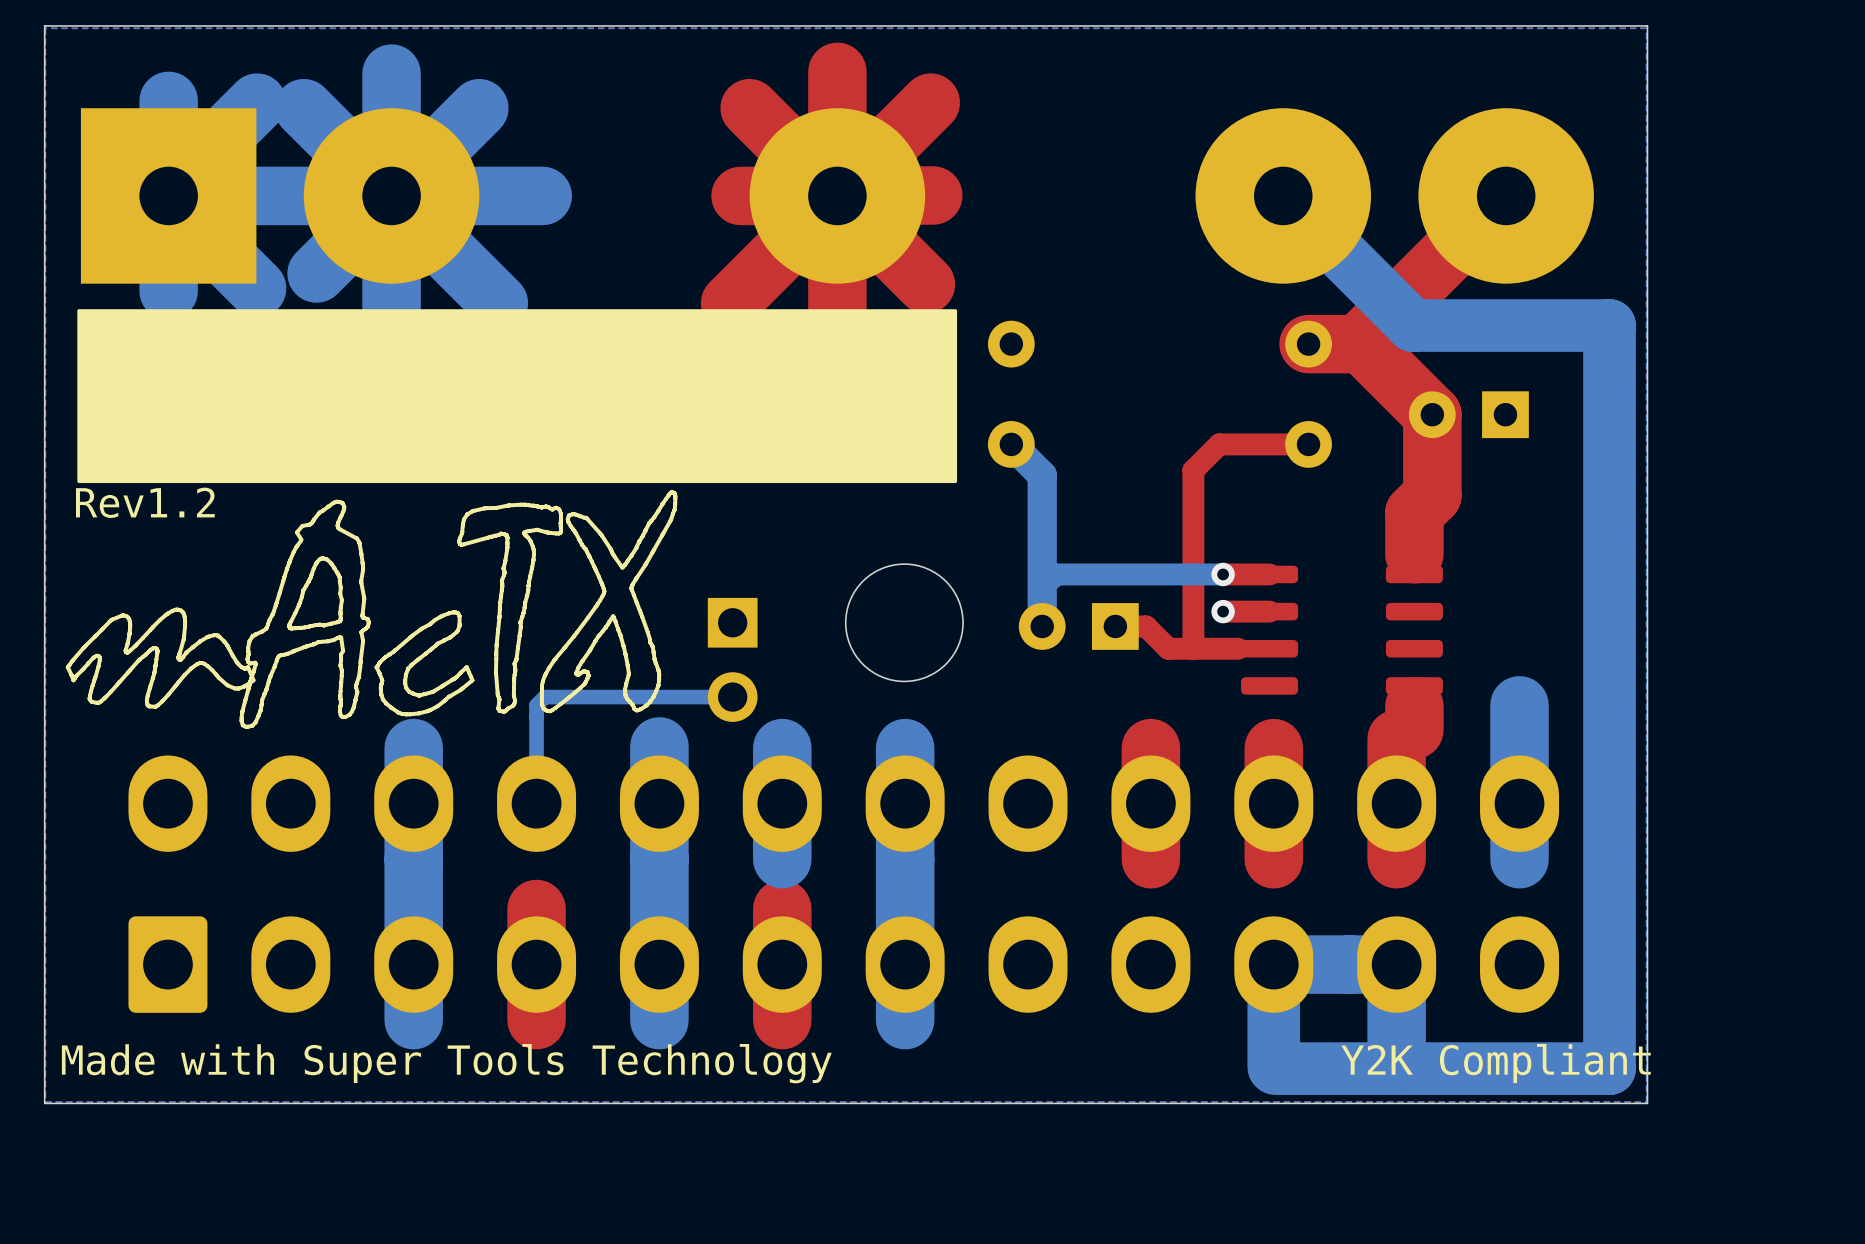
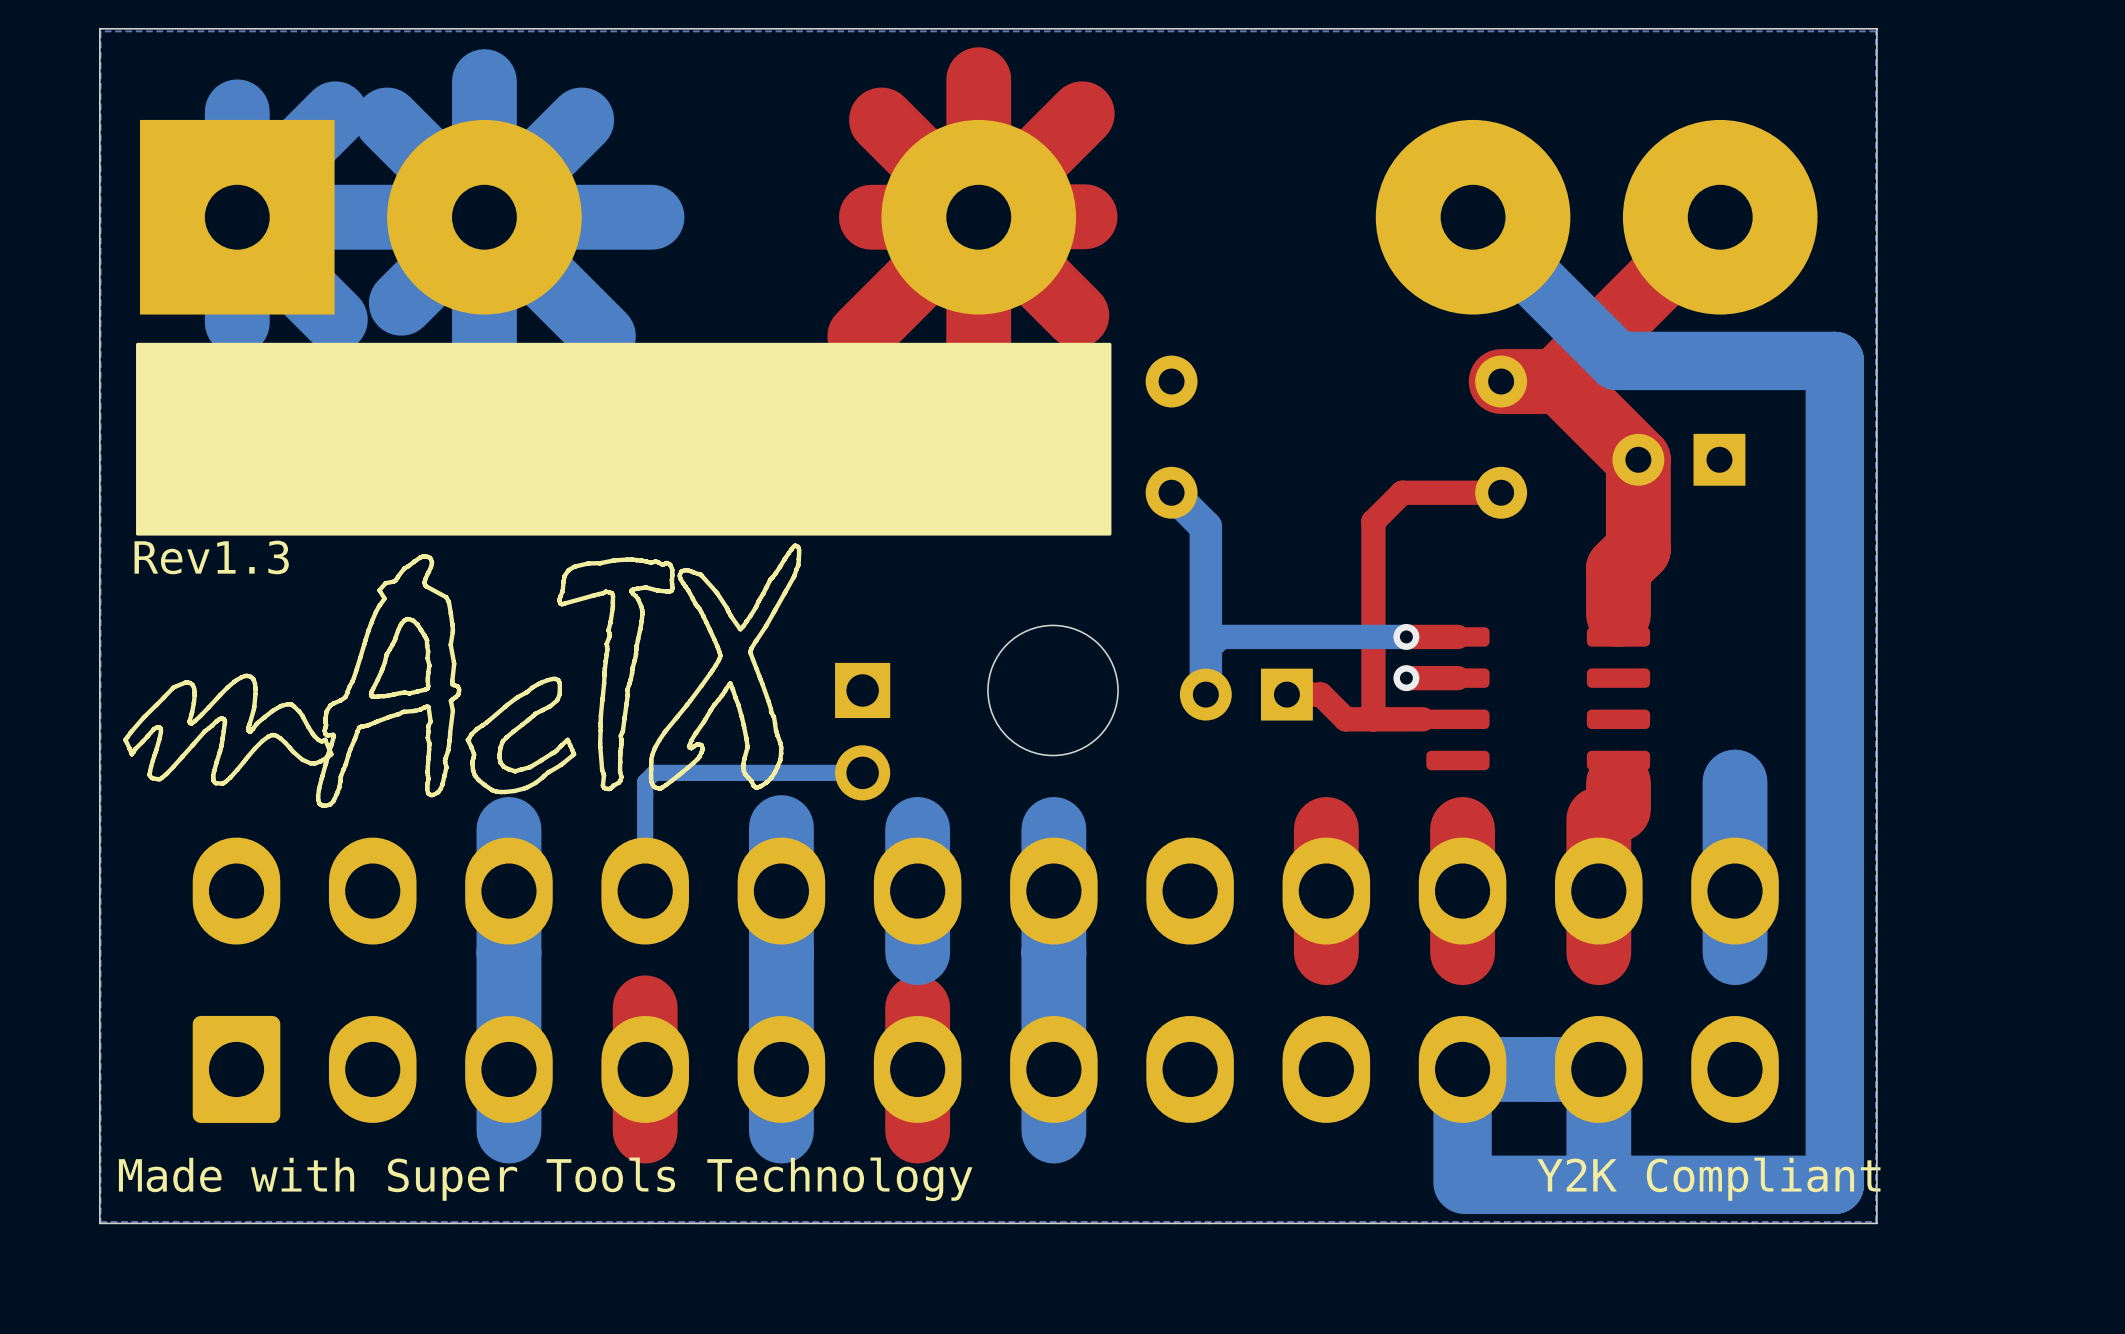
text: Rev1.2 (145, 502) -> Rev1.3 (211, 557)

